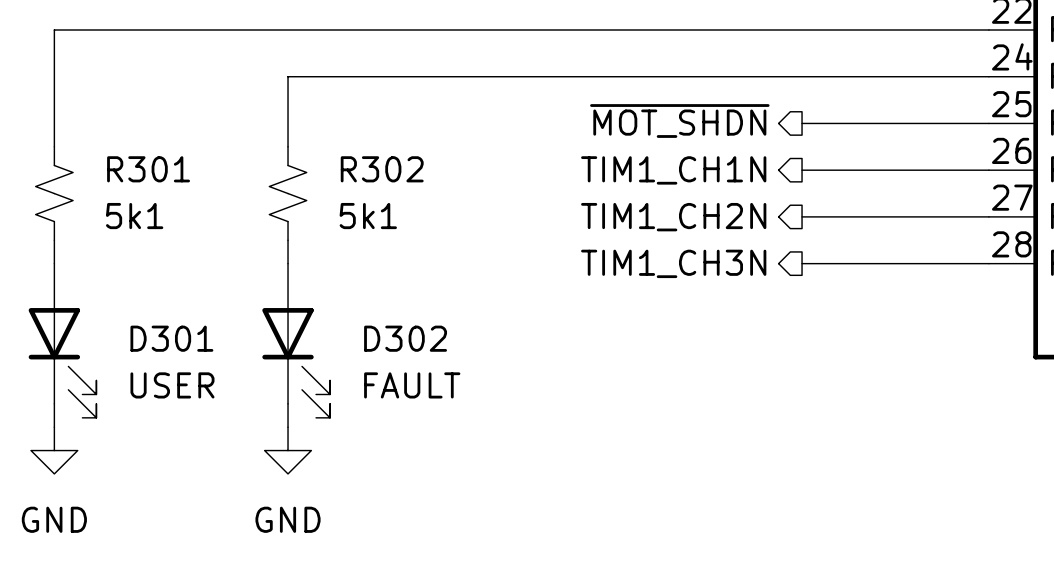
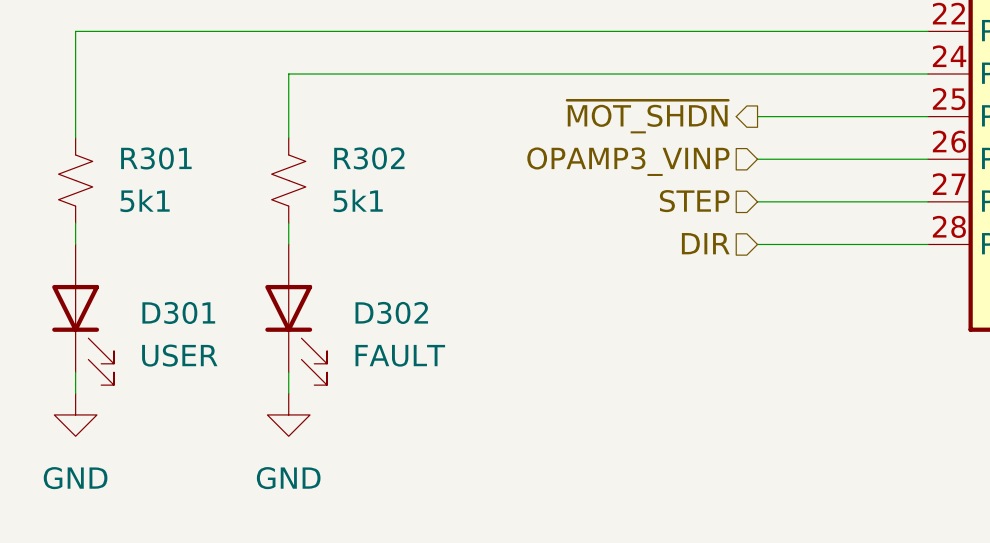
hierarchical label shape: output (673, 170) -> input (628, 161)
hierarchical label: TIM1_CH1N (673, 170) -> OPAMP3_VINP (628, 161)
hierarchical label shape: output (673, 217) -> input (694, 201)
hierarchical label: TIM1_CH2N (673, 217) -> STEP (694, 201)
hierarchical label shape: output (673, 263) -> input (705, 243)
hierarchical label: TIM1_CH3N (673, 263) -> DIR (705, 243)

